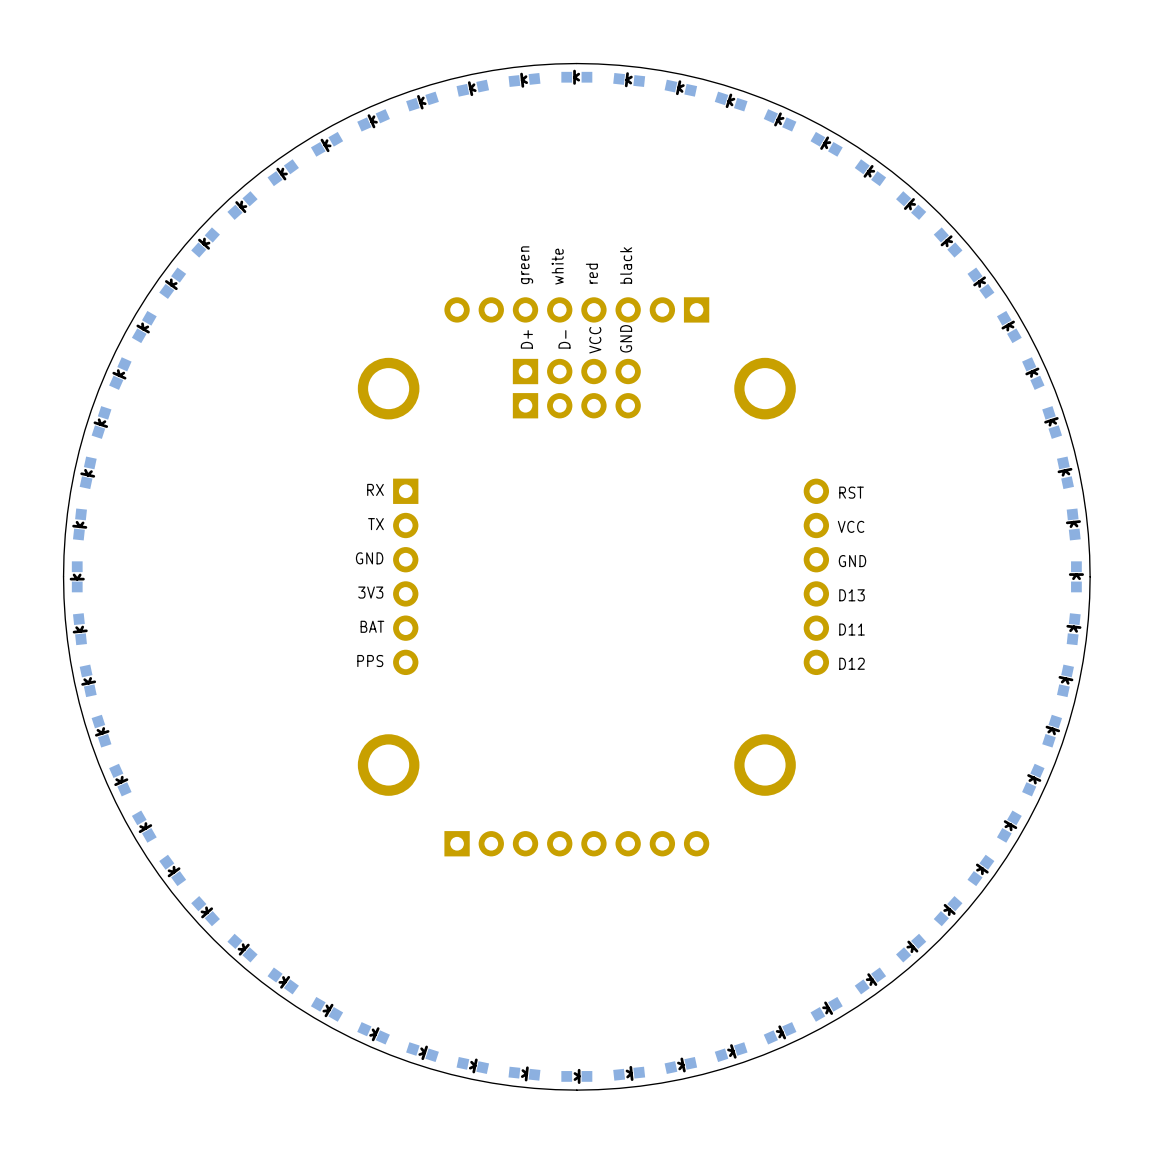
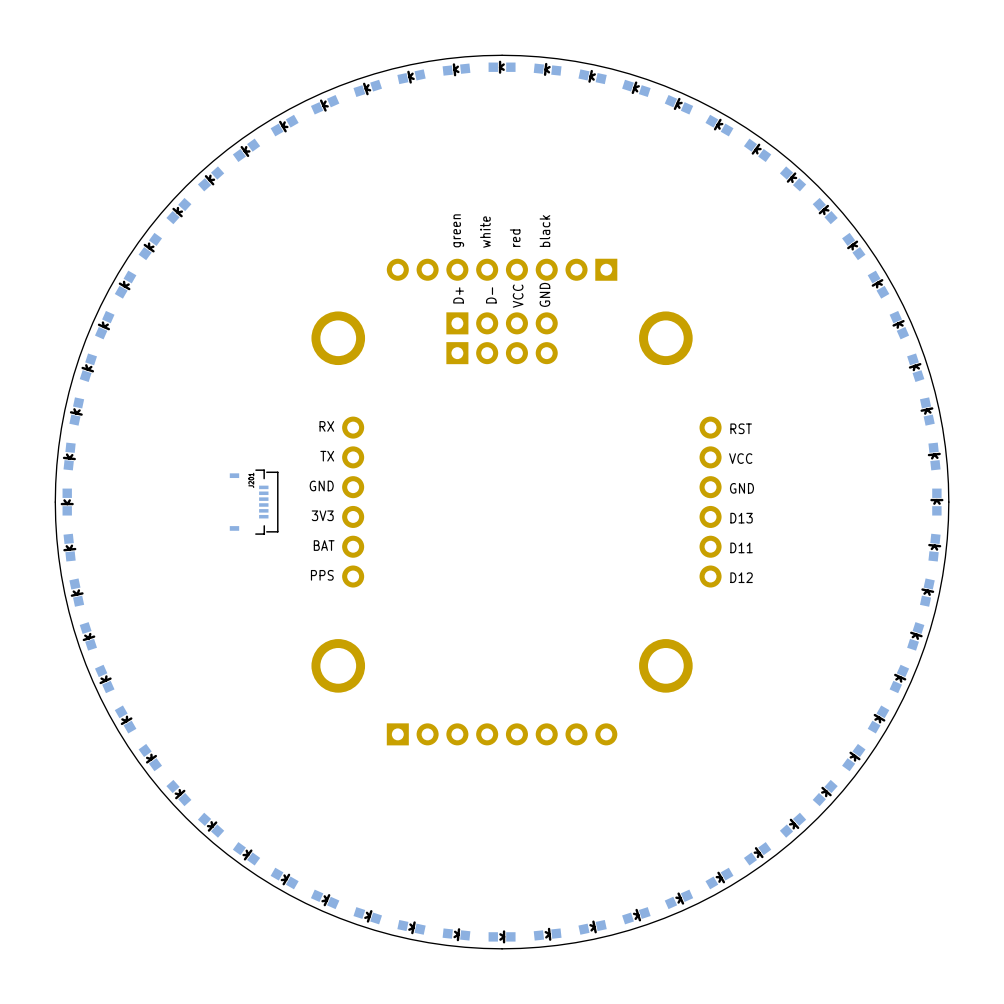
part: (405, 542) -> none
part: none -> (254, 502)
part: none -> (353, 502)

